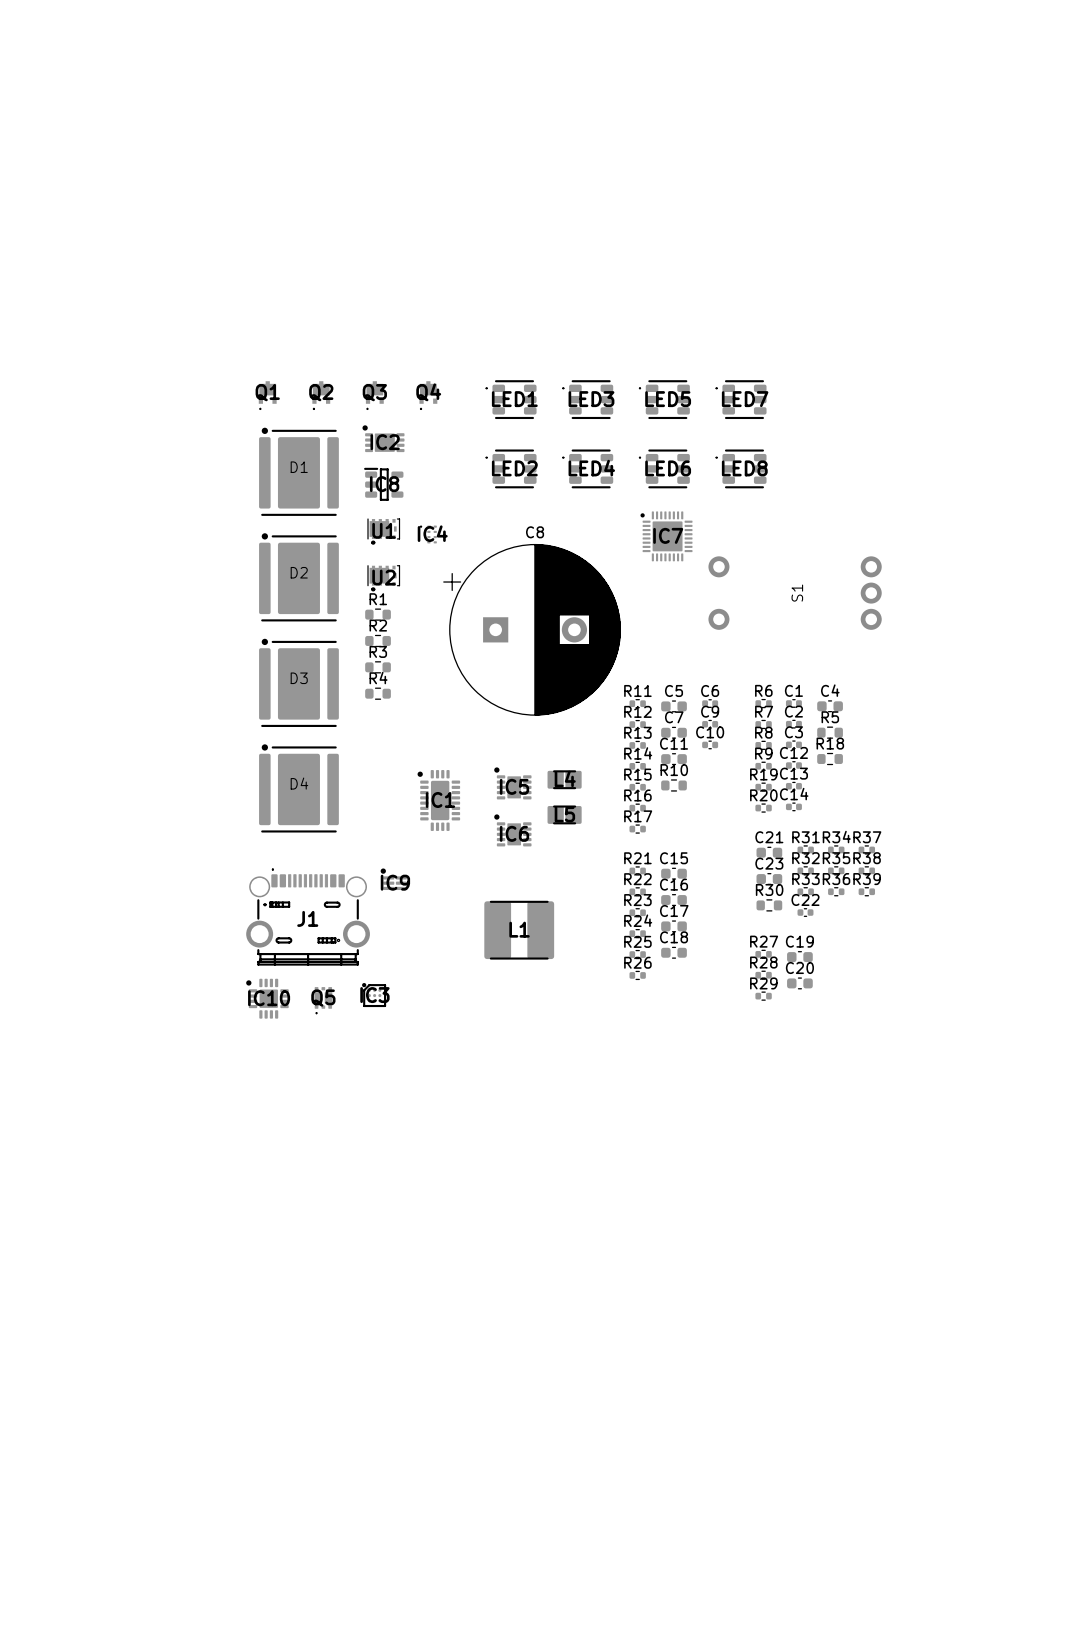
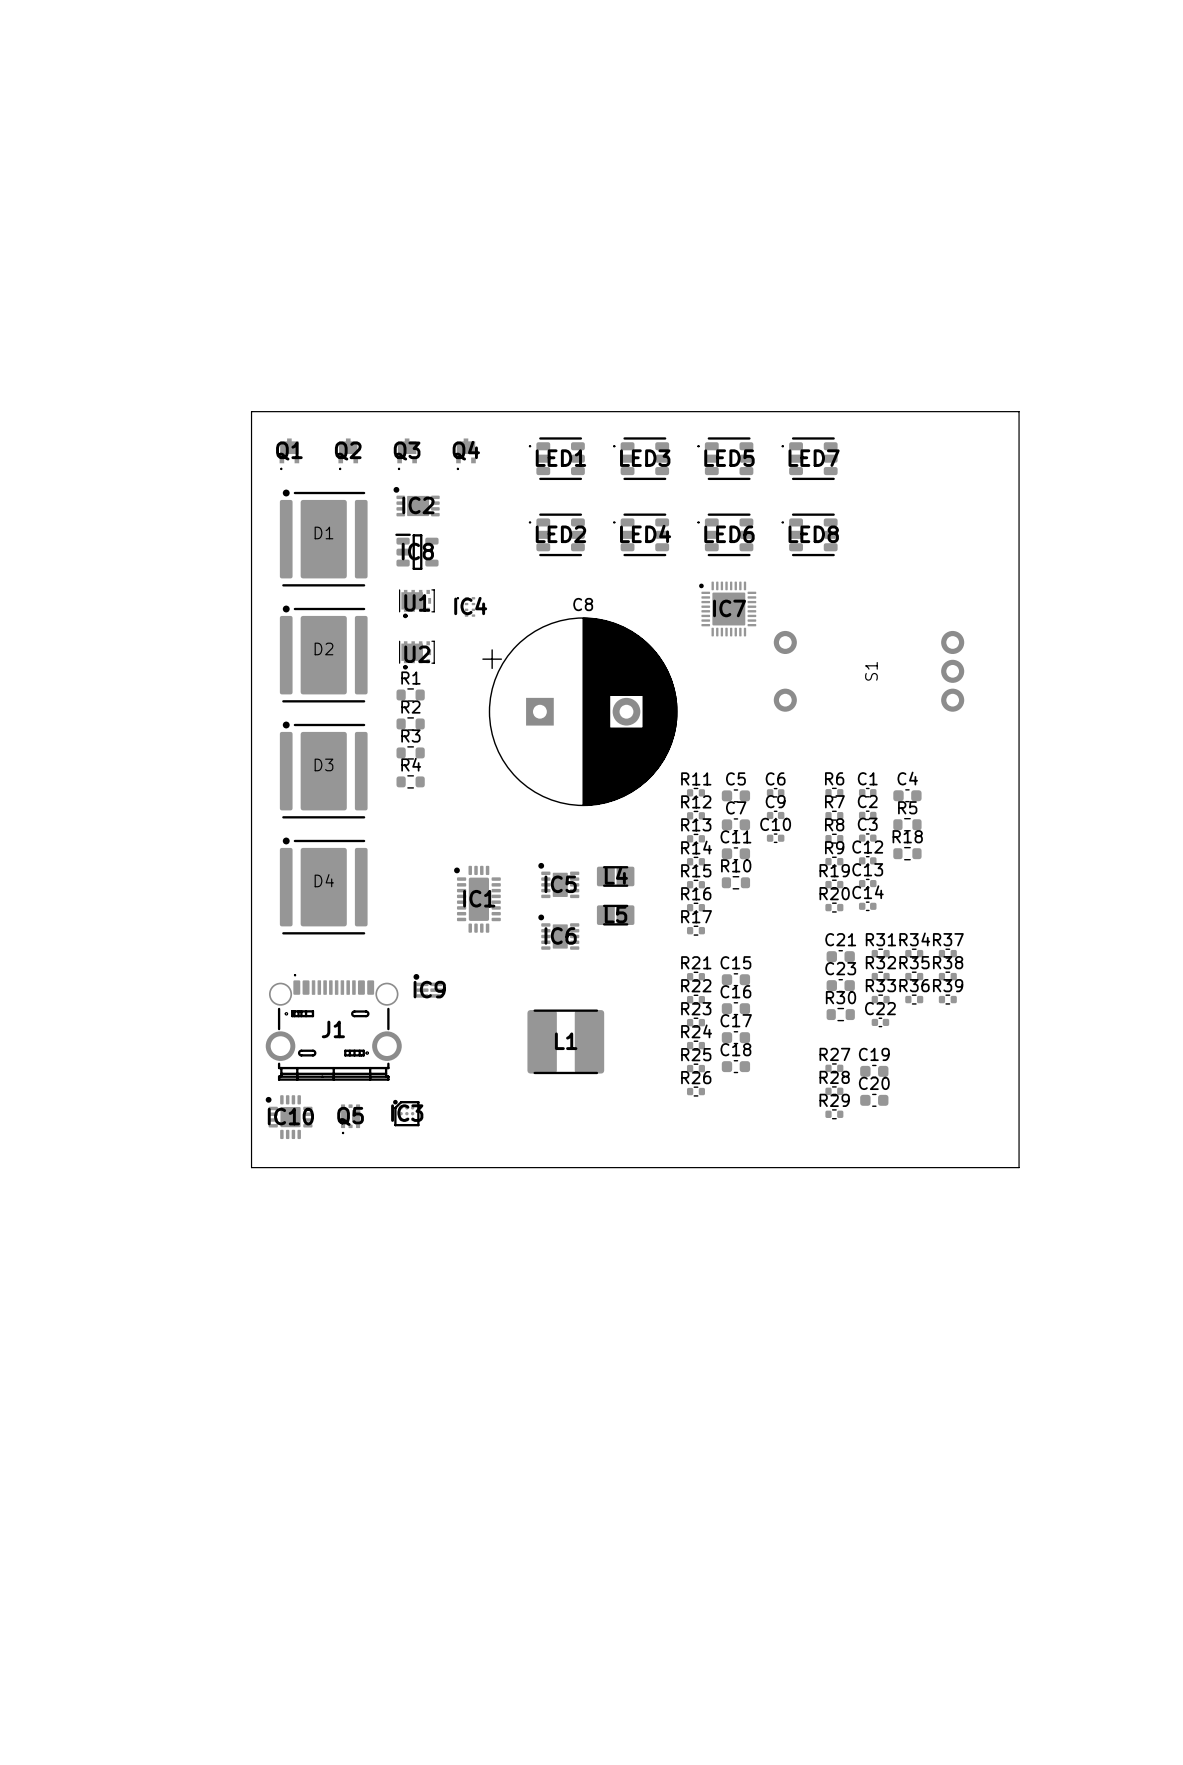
board edge: none -> (251, 411) (1019, 411) (1019, 1167) (251, 1167) (251, 411)

